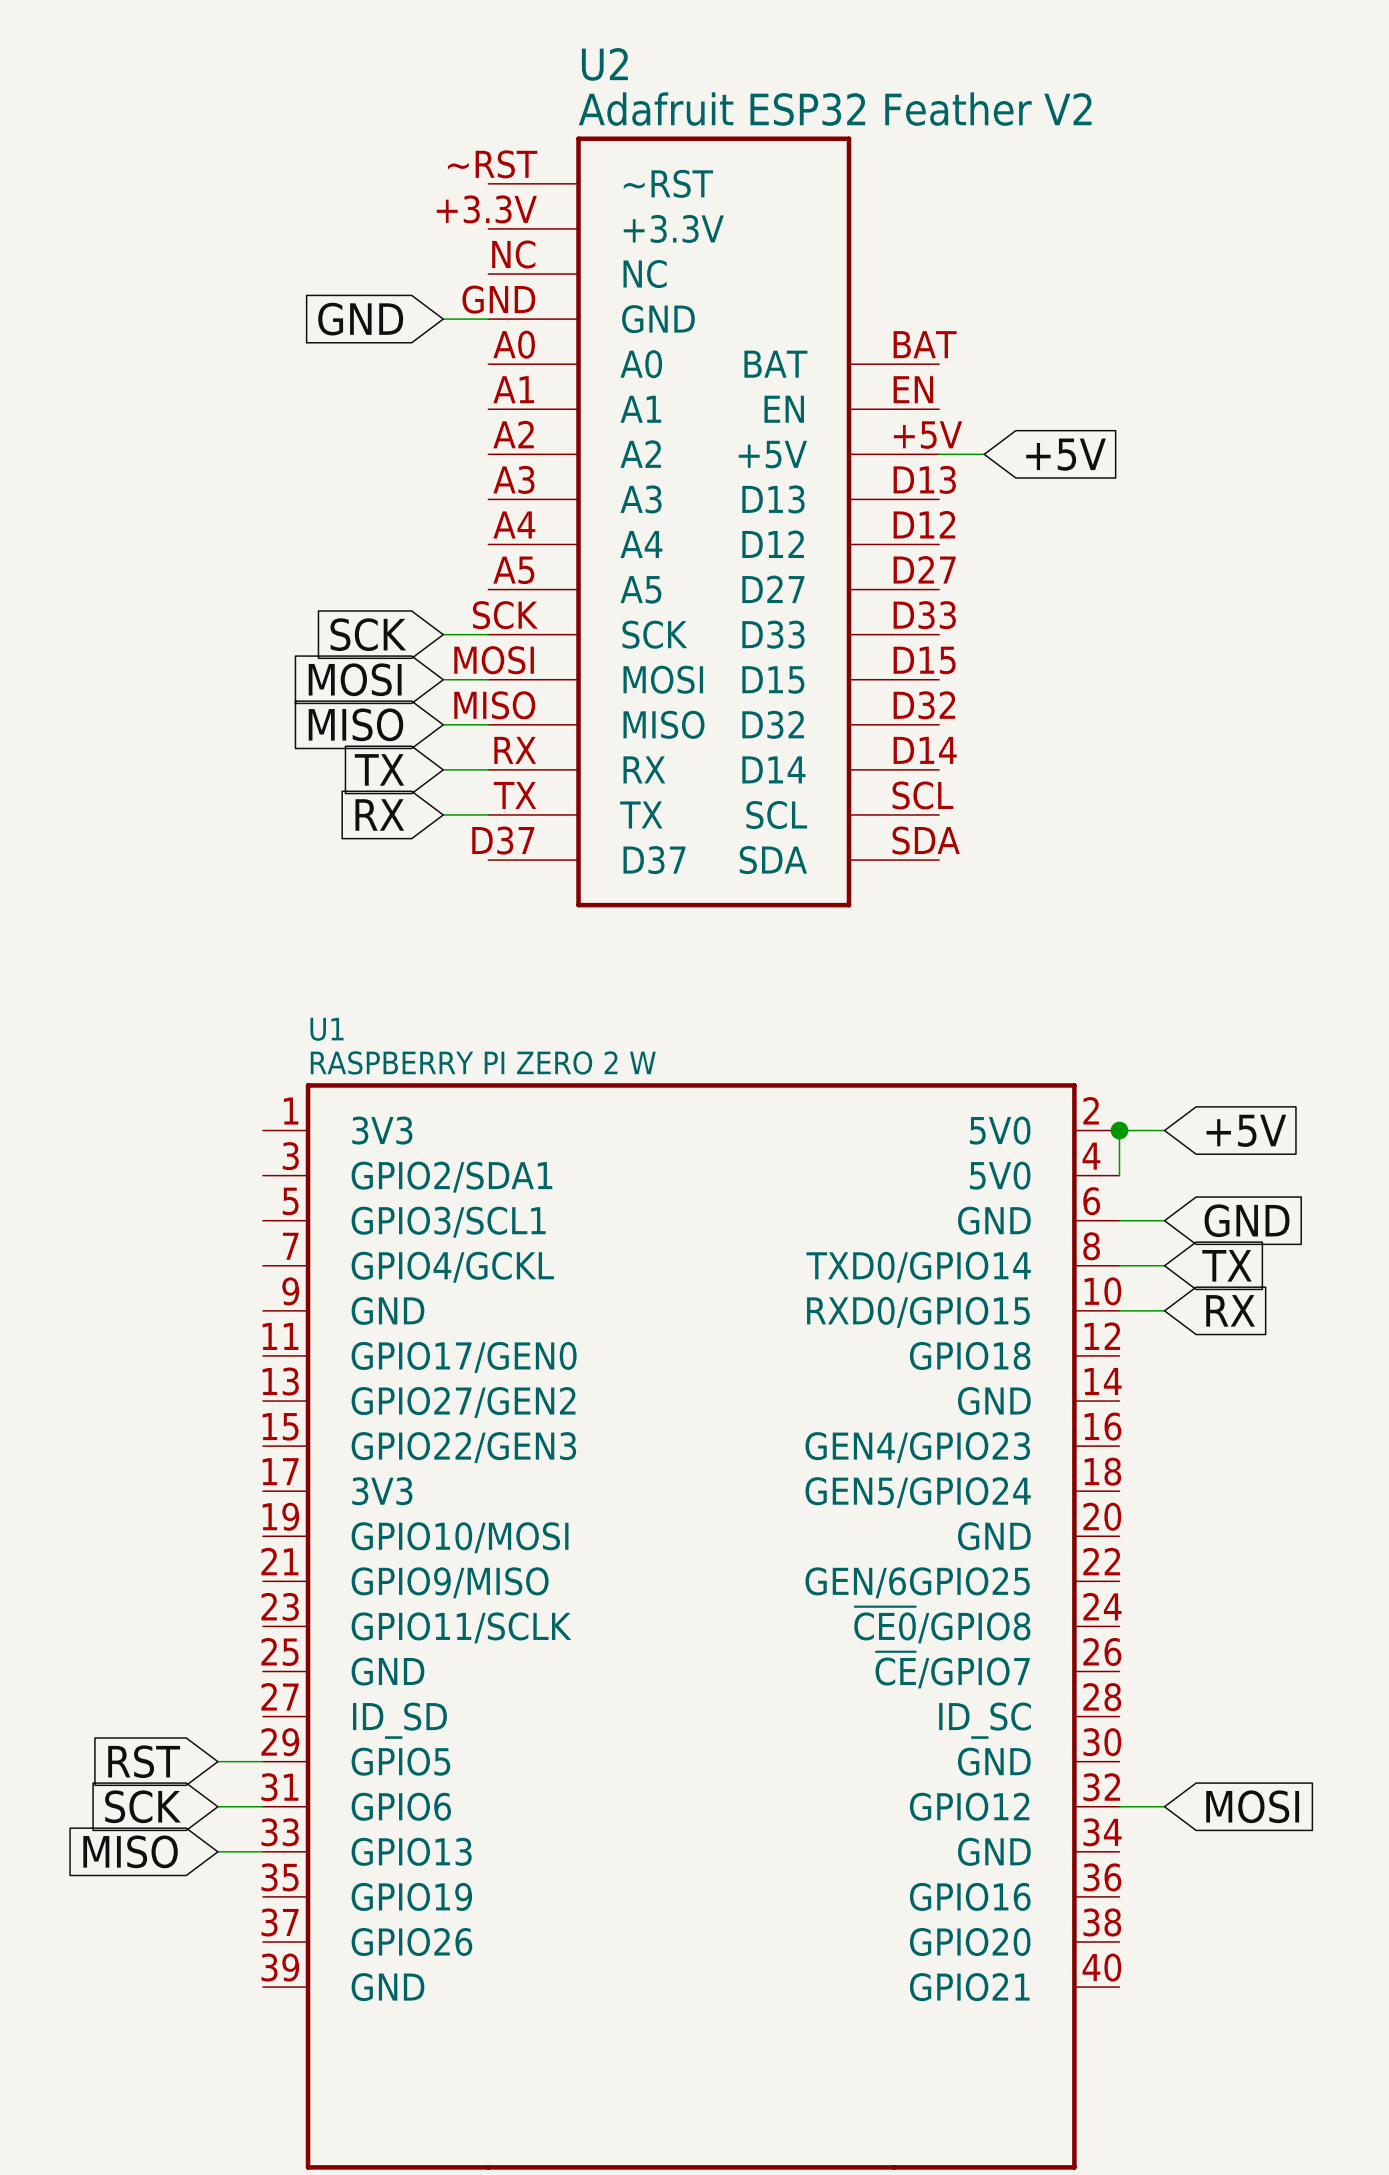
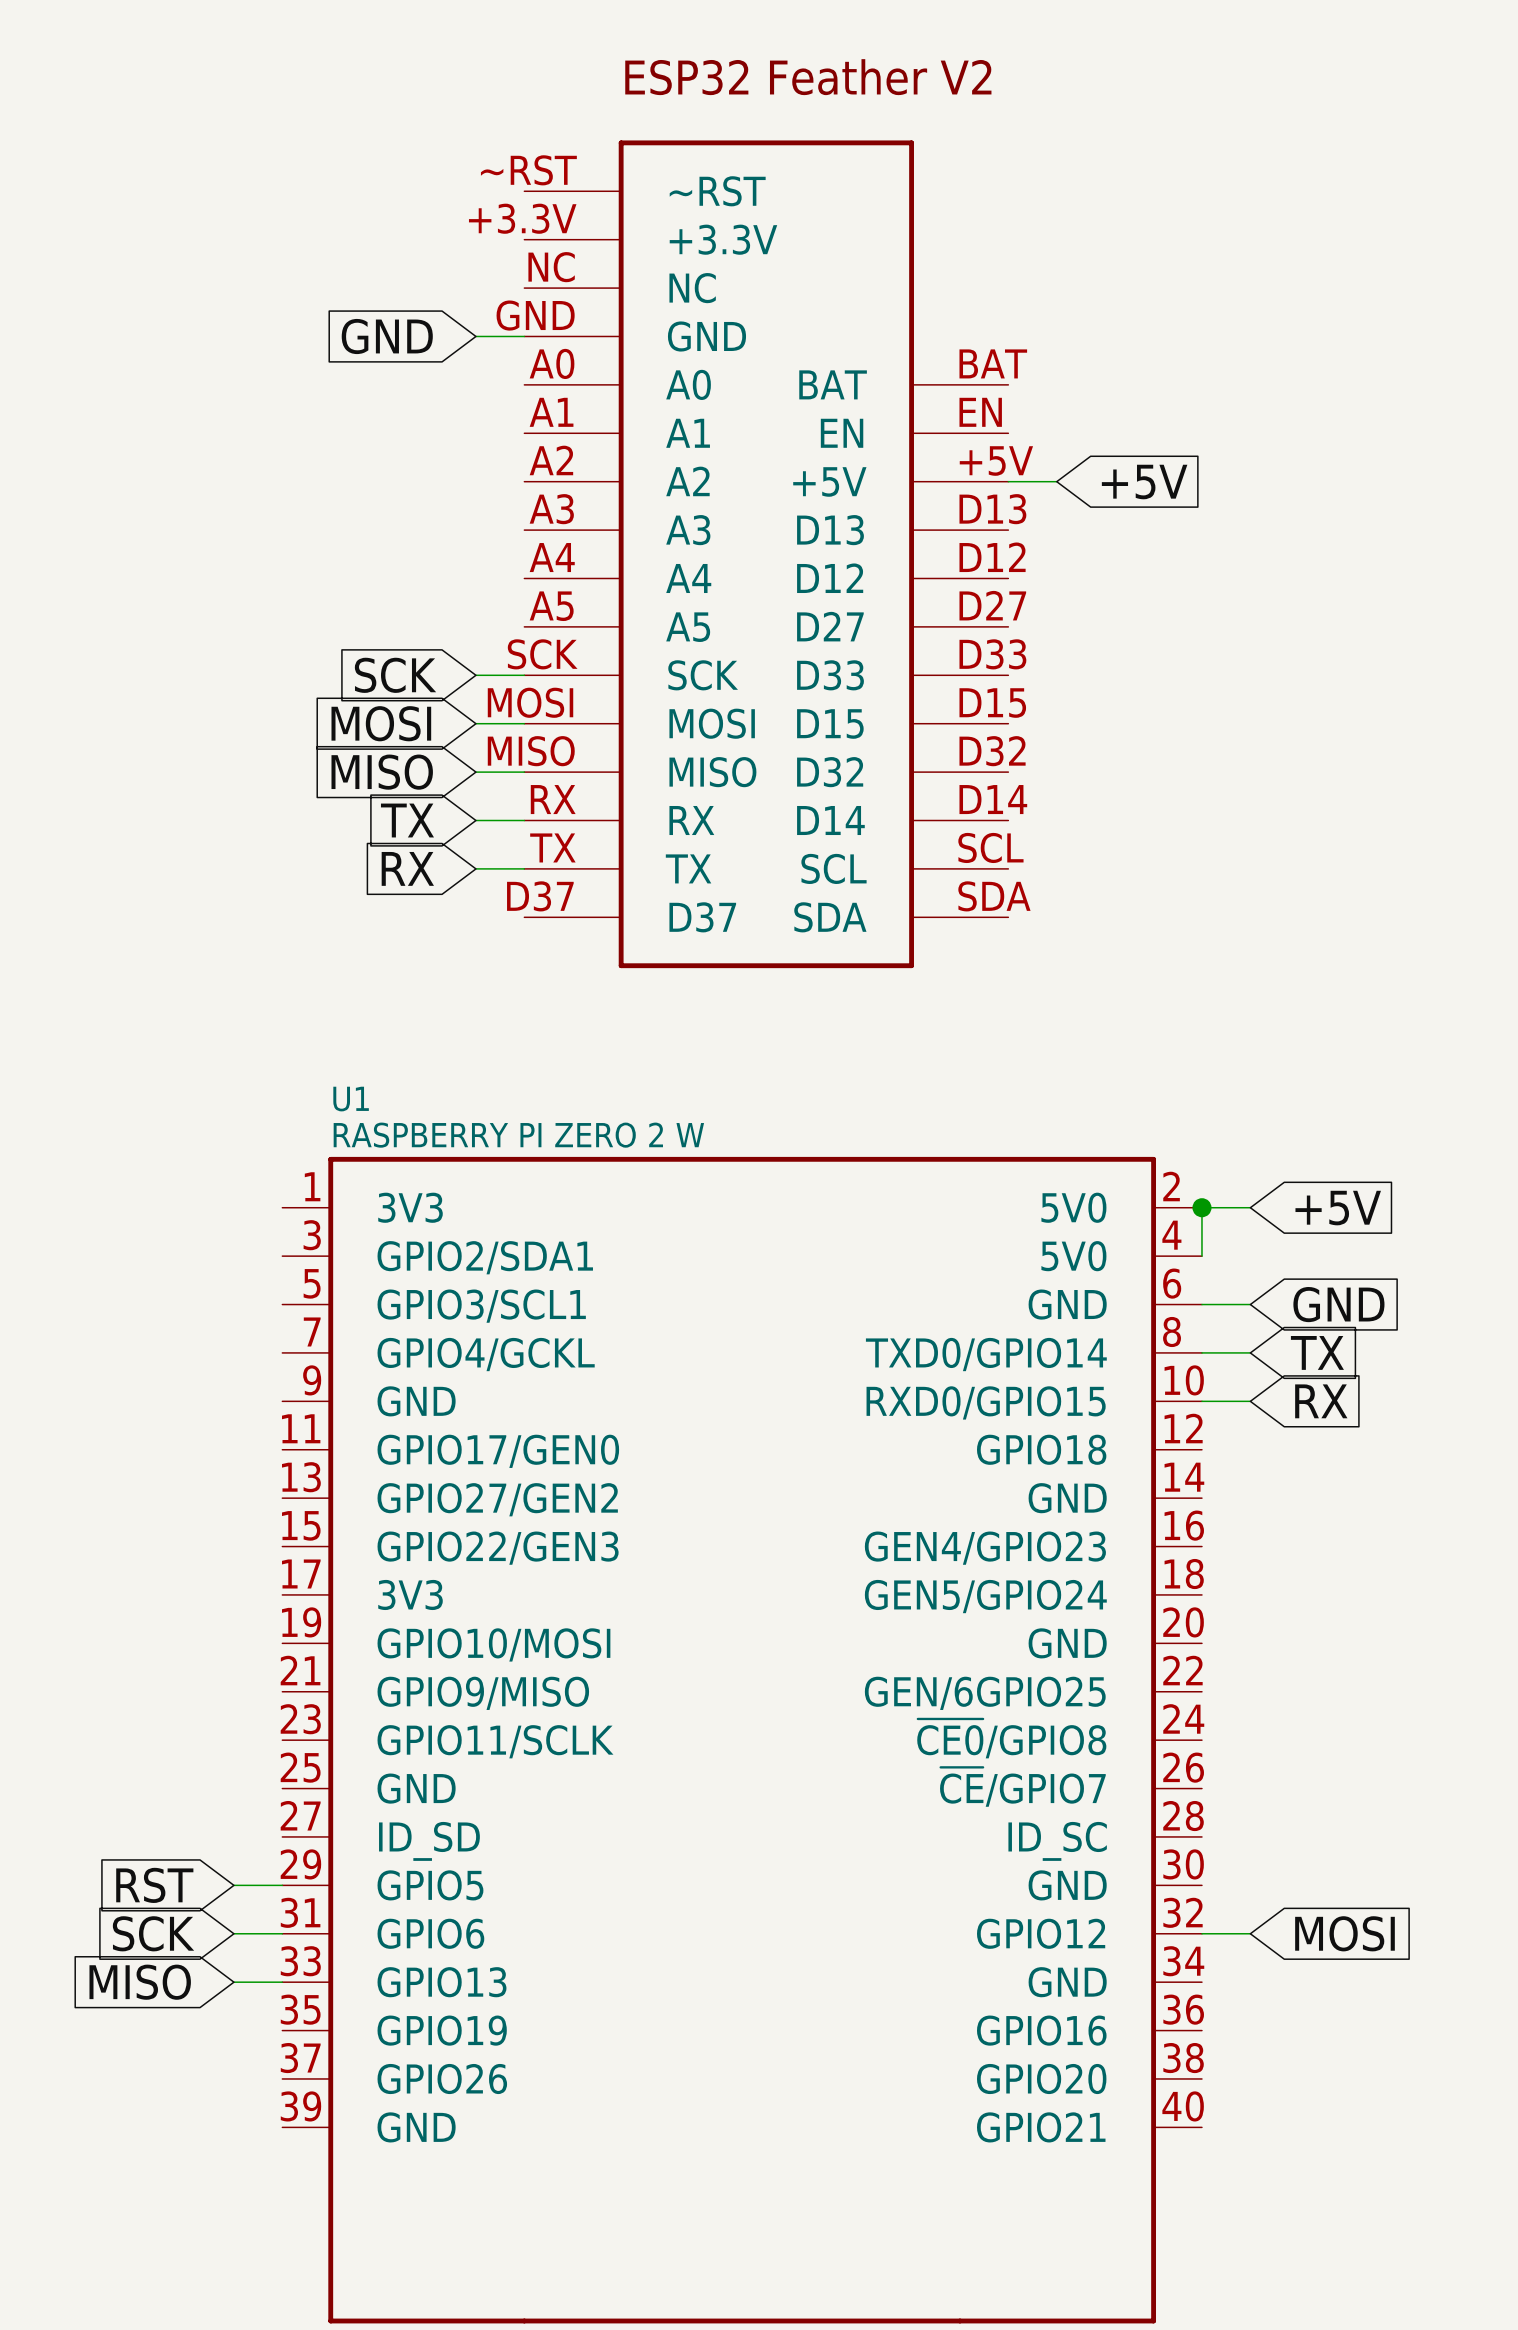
U2 name: U2 (604, 64) -> none
U2 text: none -> ESP32 Feather V2 (808, 77)
U2 value: Adafruit ESP32 Feather V2 (835, 109) -> none

